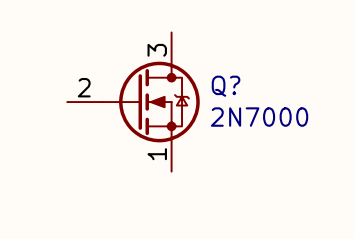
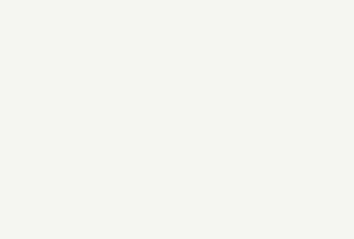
Q?: 2N7000 (133, 102) -> none

